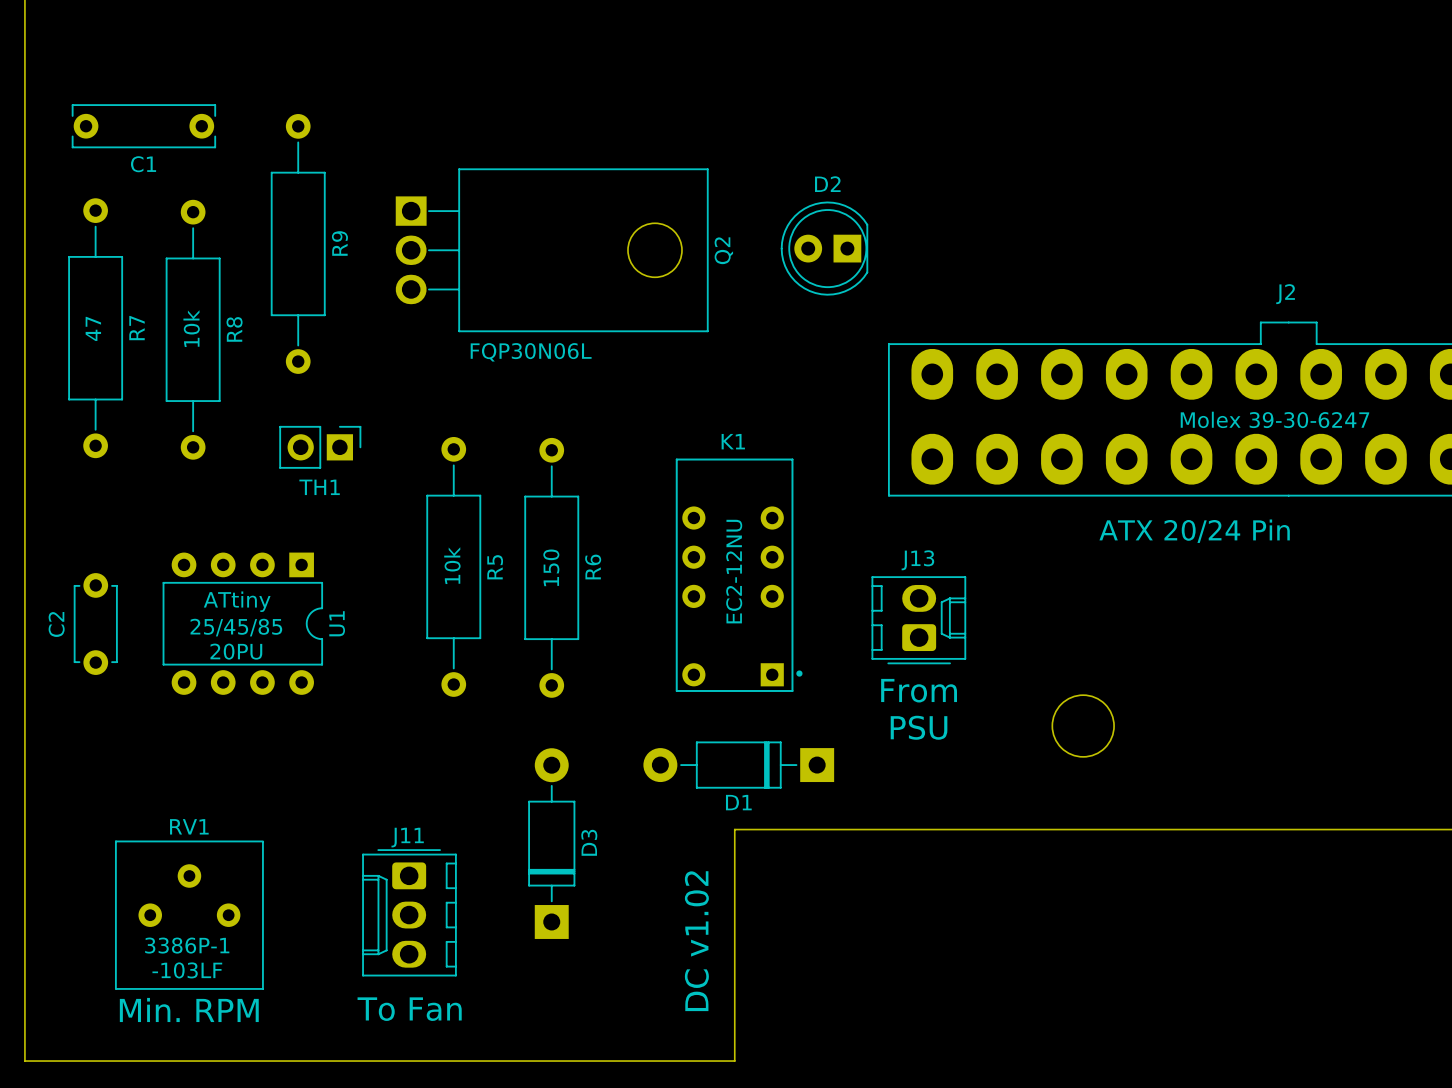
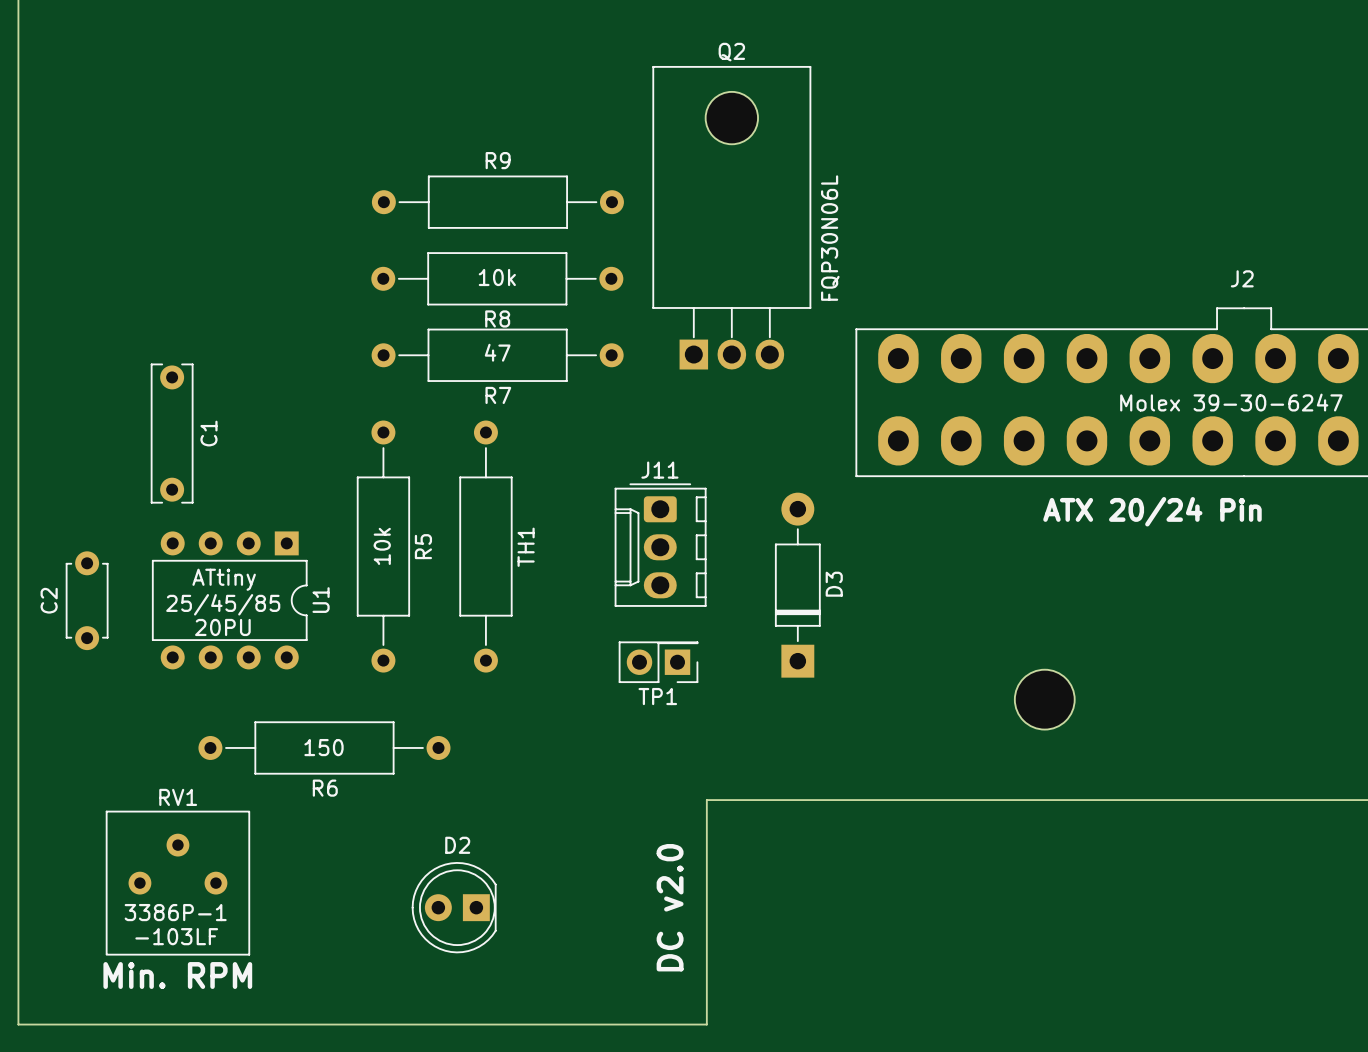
C1 rotation: 0° (143, 126) -> 90° clockwise (172, 433)
C1 position: (143, 126) -> (172, 433)
C1 name position: C1 (143, 164) -> C1 (208, 433)
R9 rotation: 0° (298, 243) -> 90° clockwise (497, 202)
R9 position: (298, 243) -> (497, 202)
R9 name position: R9 (339, 243) -> R9 (498, 160)
D2 position: (824, 248) -> (454, 907)
Q2 rotation: 0° (552, 250) -> 90° counterclockwise (731, 217)
Q2 position: (552, 250) -> (731, 217)
R7 rotation: 0° (95, 328) -> 90° clockwise (497, 355)
R7 position: (95, 328) -> (497, 355)
R8 rotation: 0° (193, 329) -> 90° clockwise (497, 278)
R8 position: (193, 329) -> (497, 278)
TH1 footprint: [279, 425, 362, 469] -> [459, 420, 513, 673]
TH1 name position: TH1 (319, 487) -> TH1 (526, 547)
R5 position: (453, 566) -> (383, 546)
R6 rotation: 0° (551, 567) -> 90° clockwise (324, 747)
R6 position: (551, 567) -> (324, 747)
K1: EC2-12NU (739, 575) -> none
J13: (918, 620) -> none
TP1: none -> (658, 662)
text: From (919, 690) -> none
text: PSU (919, 727) -> none
D1: (738, 765) -> none
D3 position: (551, 843) -> (797, 585)
J11 position: (409, 912) -> (660, 545)
text: DC v1.02 (696, 941) -> DC v2.0 (670, 907)
text: To Fan (409, 1009) -> none

